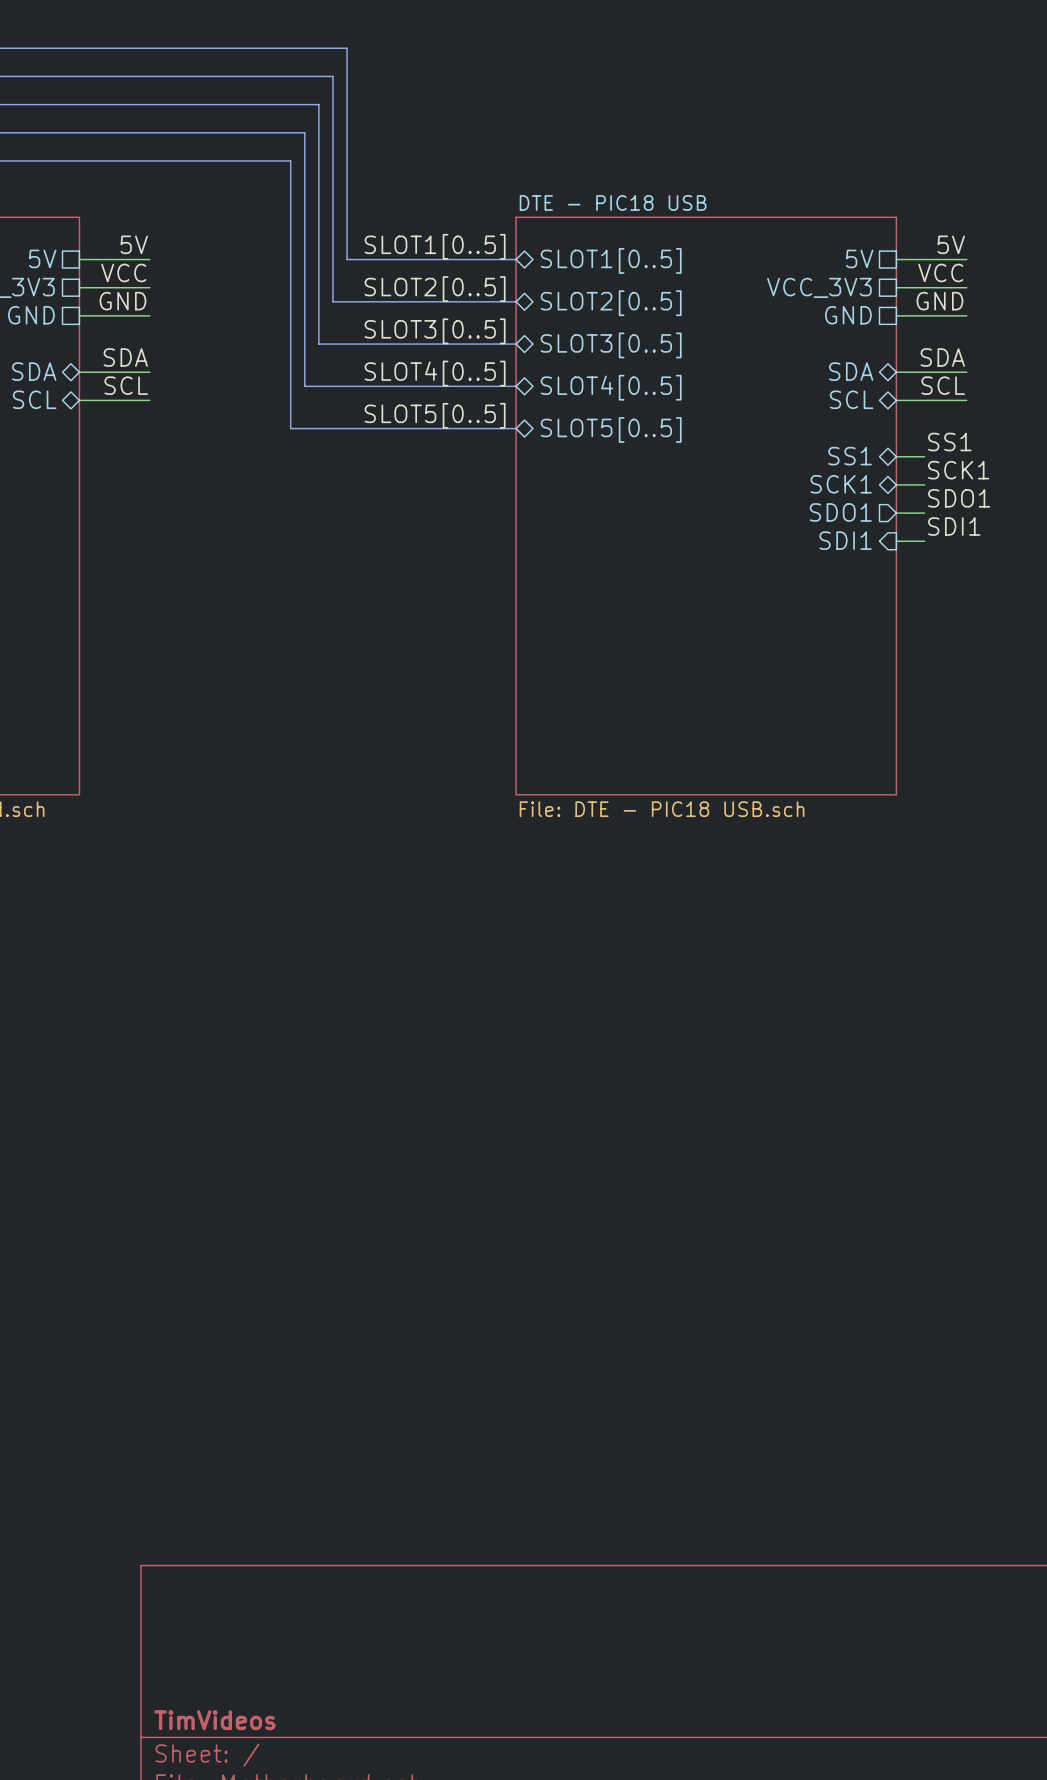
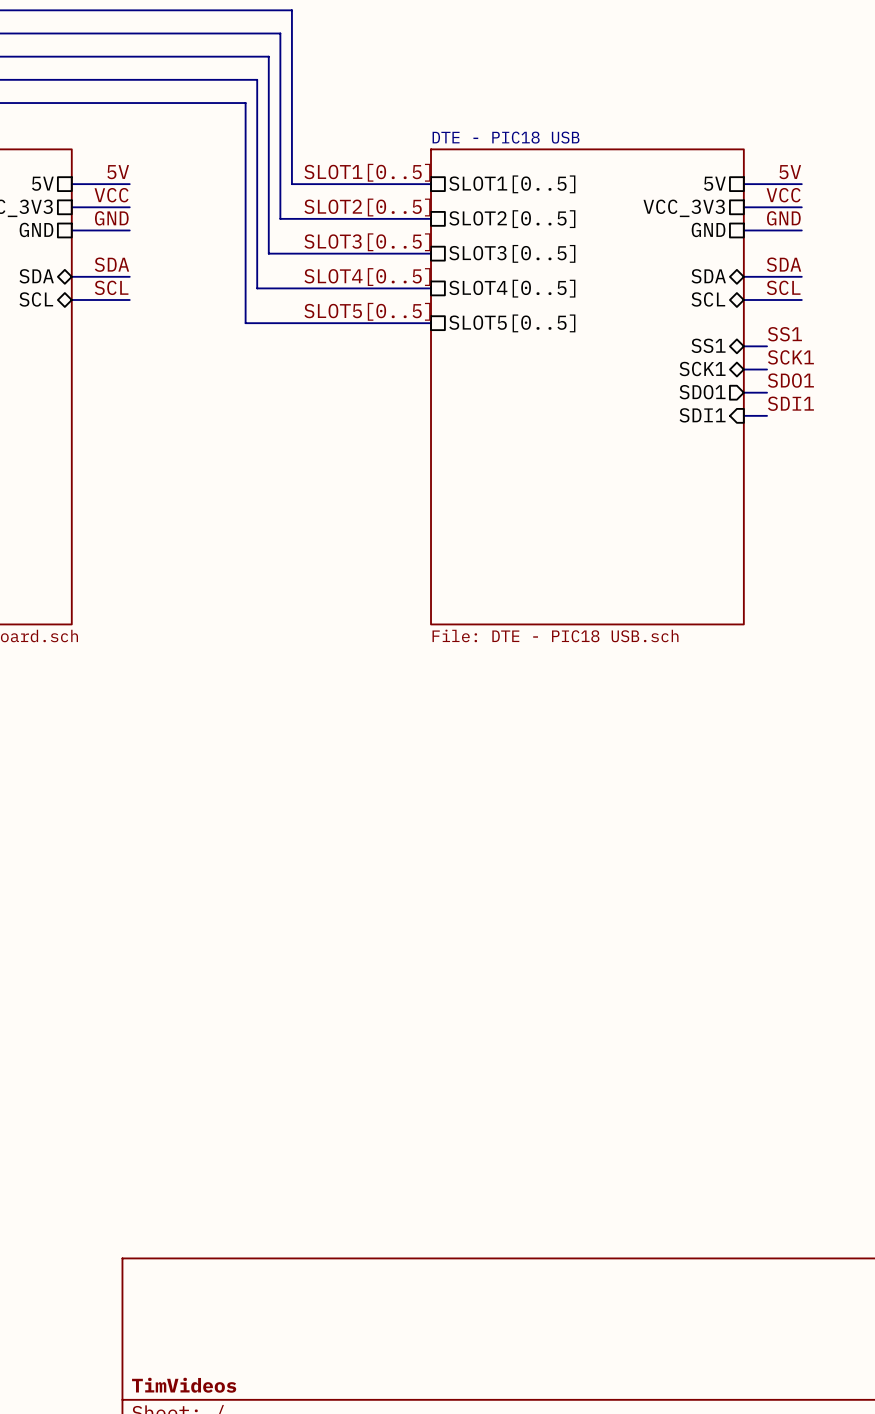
sheet pin shape: bidirectional (611, 260) -> passive (512, 184)
sheet pin shape: bidirectional (611, 303) -> passive (512, 219)
sheet pin shape: bidirectional (611, 345) -> passive (512, 253)
sheet pin shape: bidirectional (611, 387) -> passive (512, 288)
sheet pin shape: bidirectional (611, 429) -> passive (512, 323)

